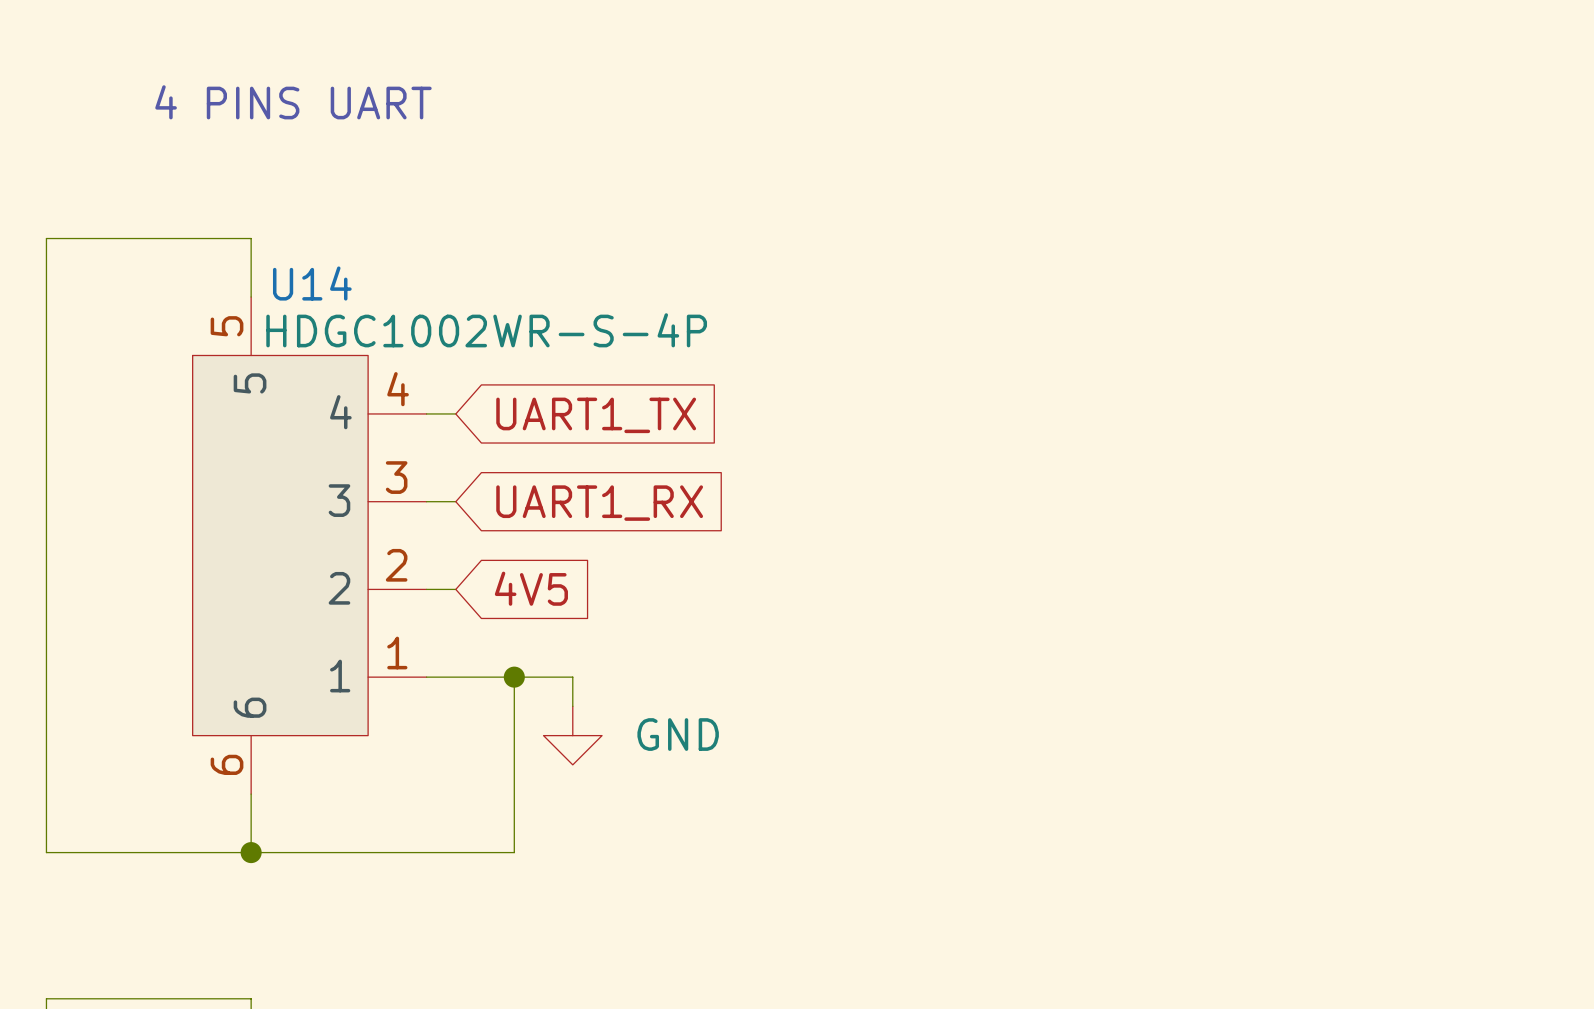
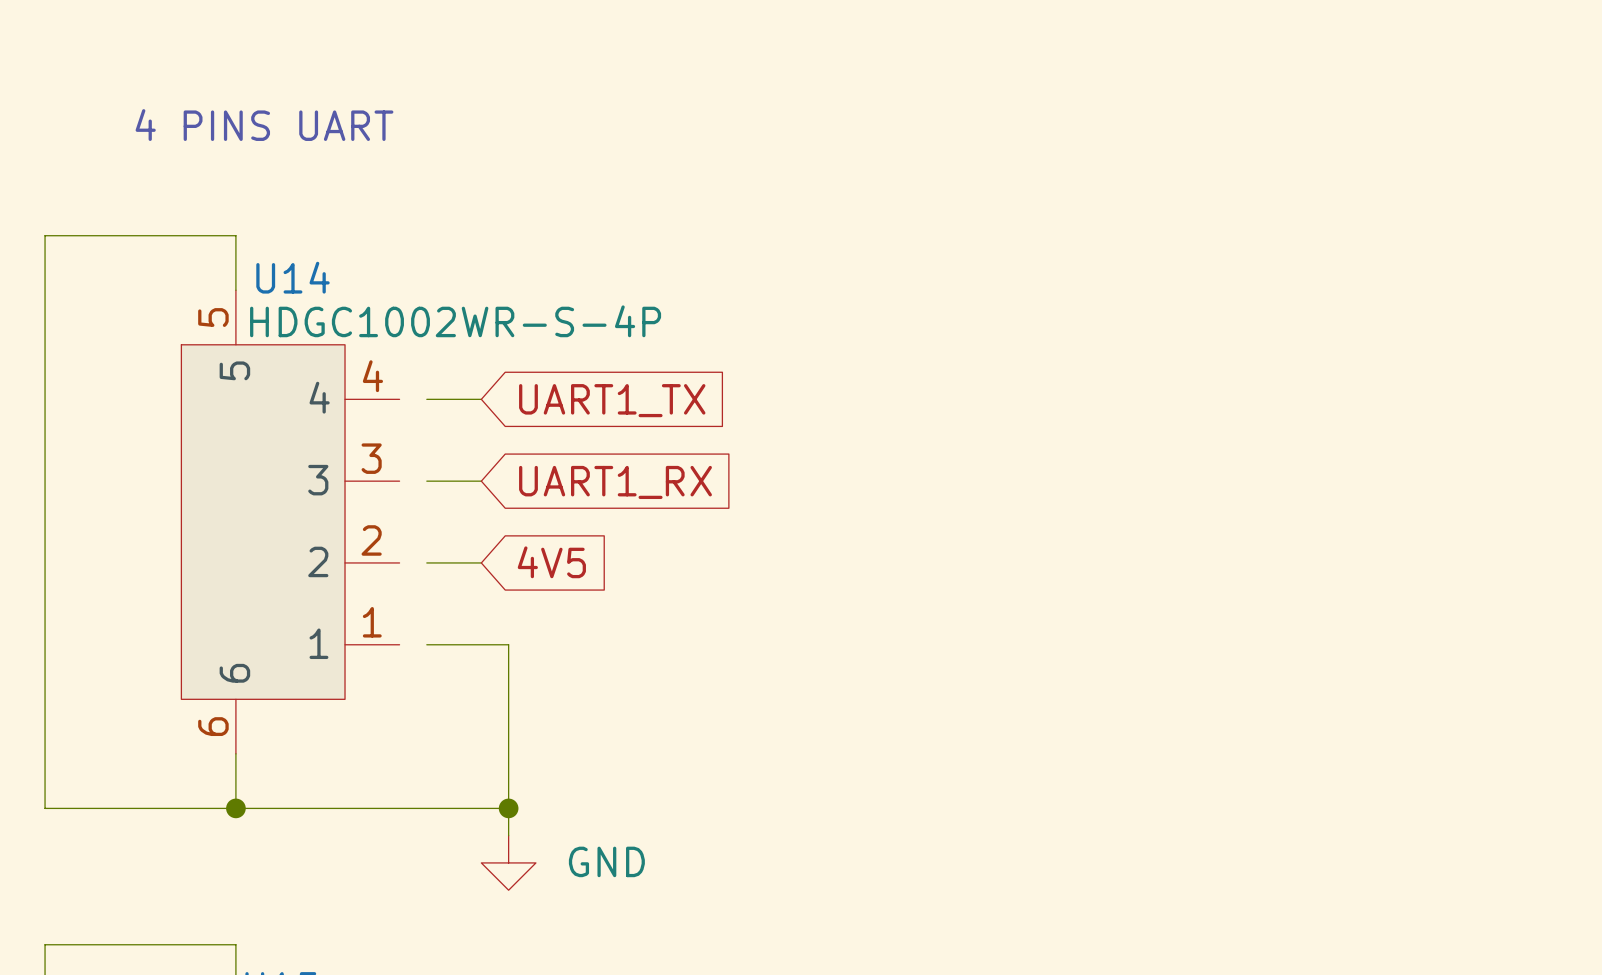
text position: 4 PINS UART (293, 102) -> 4 PINS UART (264, 125)
wire: (426, 413) (455, 413) -> (481, 399) (426, 399)
global label position: UART1_TX (596, 415) -> UART1_TX (612, 400)
wire: (426, 501) (455, 501) -> (481, 481) (426, 481)
global label position: UART1_RX (599, 503) -> UART1_RX (615, 482)
global label position: 4V5 (531, 588) -> 4V5 (551, 562)
wire: (426, 589) (455, 589) -> (481, 562) (426, 562)
wire: (426, 677) (455, 677) -> none
wire: (514, 677) (514, 852) -> (508, 808) (481, 808)
junction: (514, 677) -> none
wire: (543, 677) (572, 677) (572, 706) -> (508, 644) (508, 835)
power symbol position: GND (572, 735) -> GND (508, 862)
junction: none -> (508, 808)

